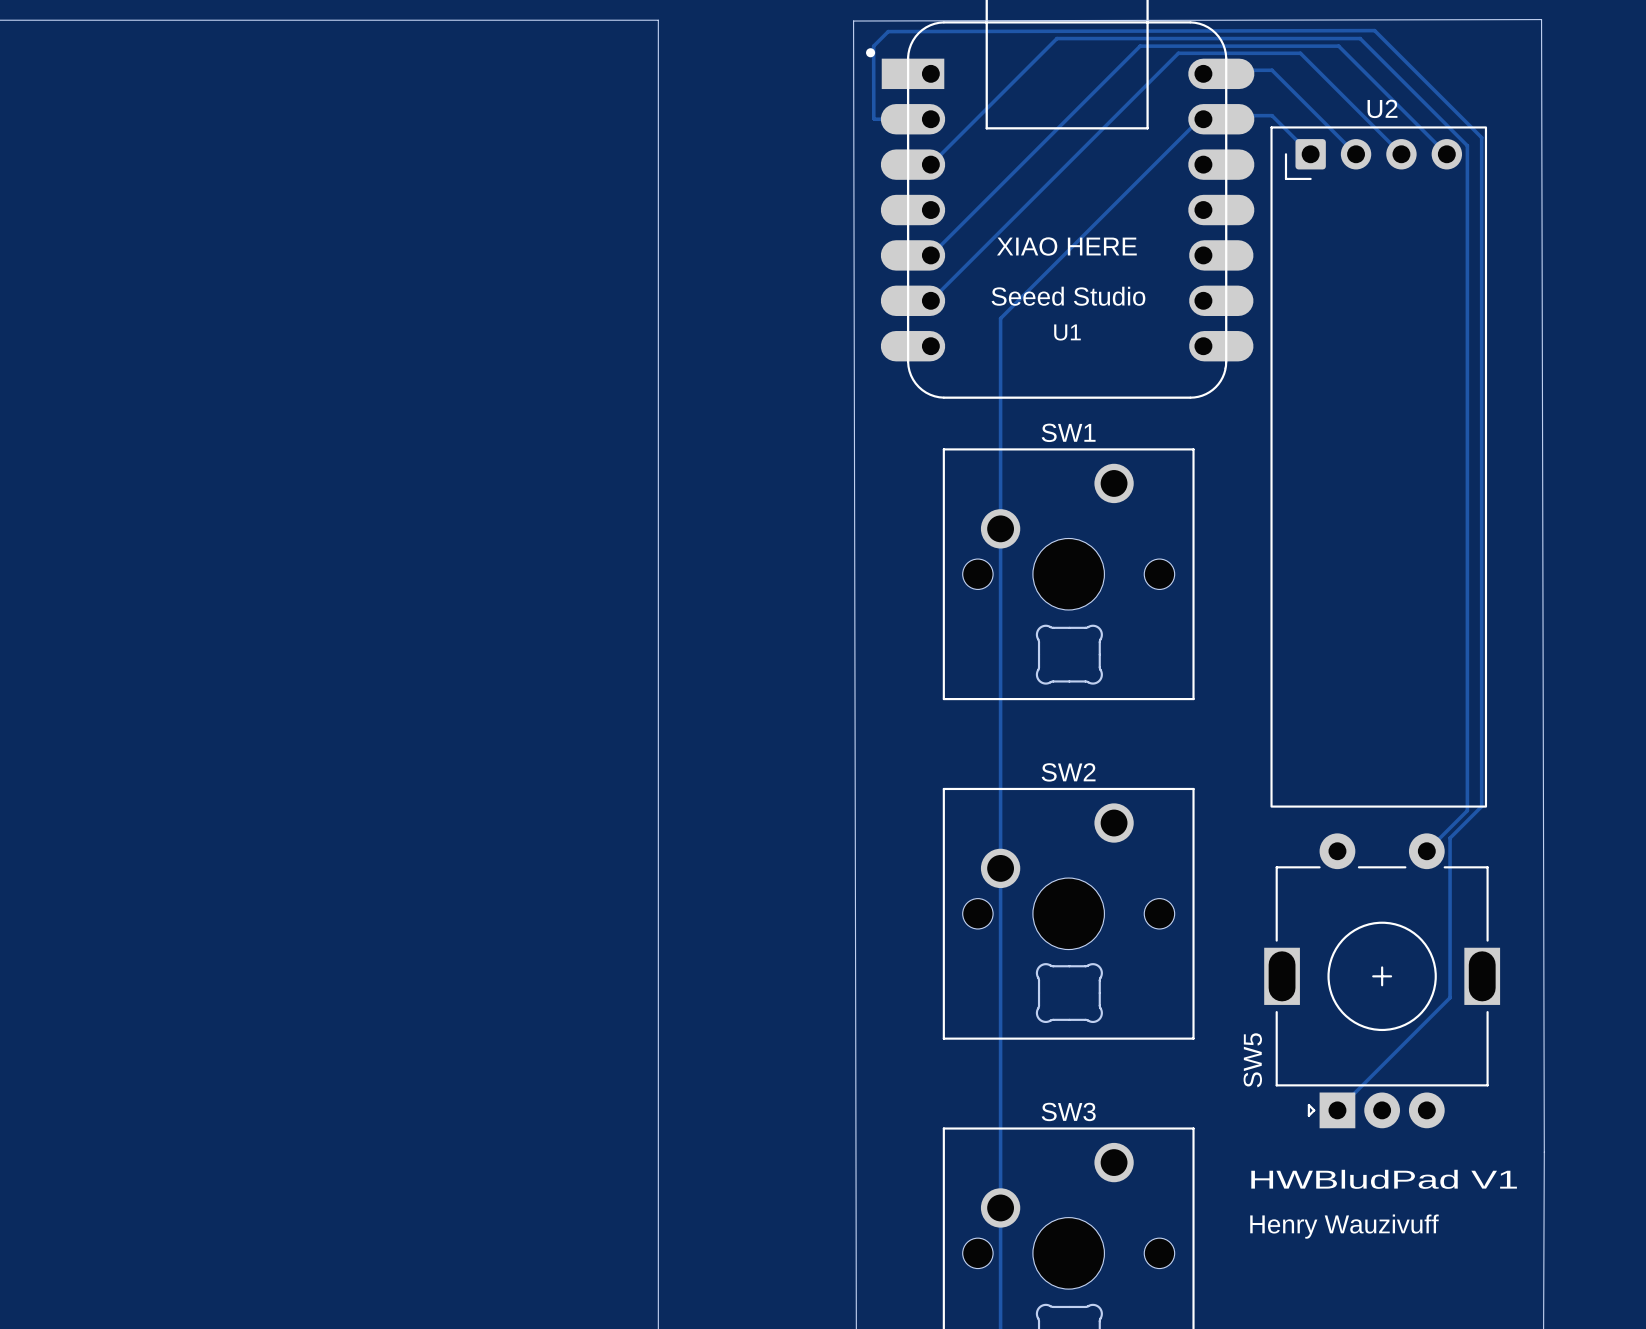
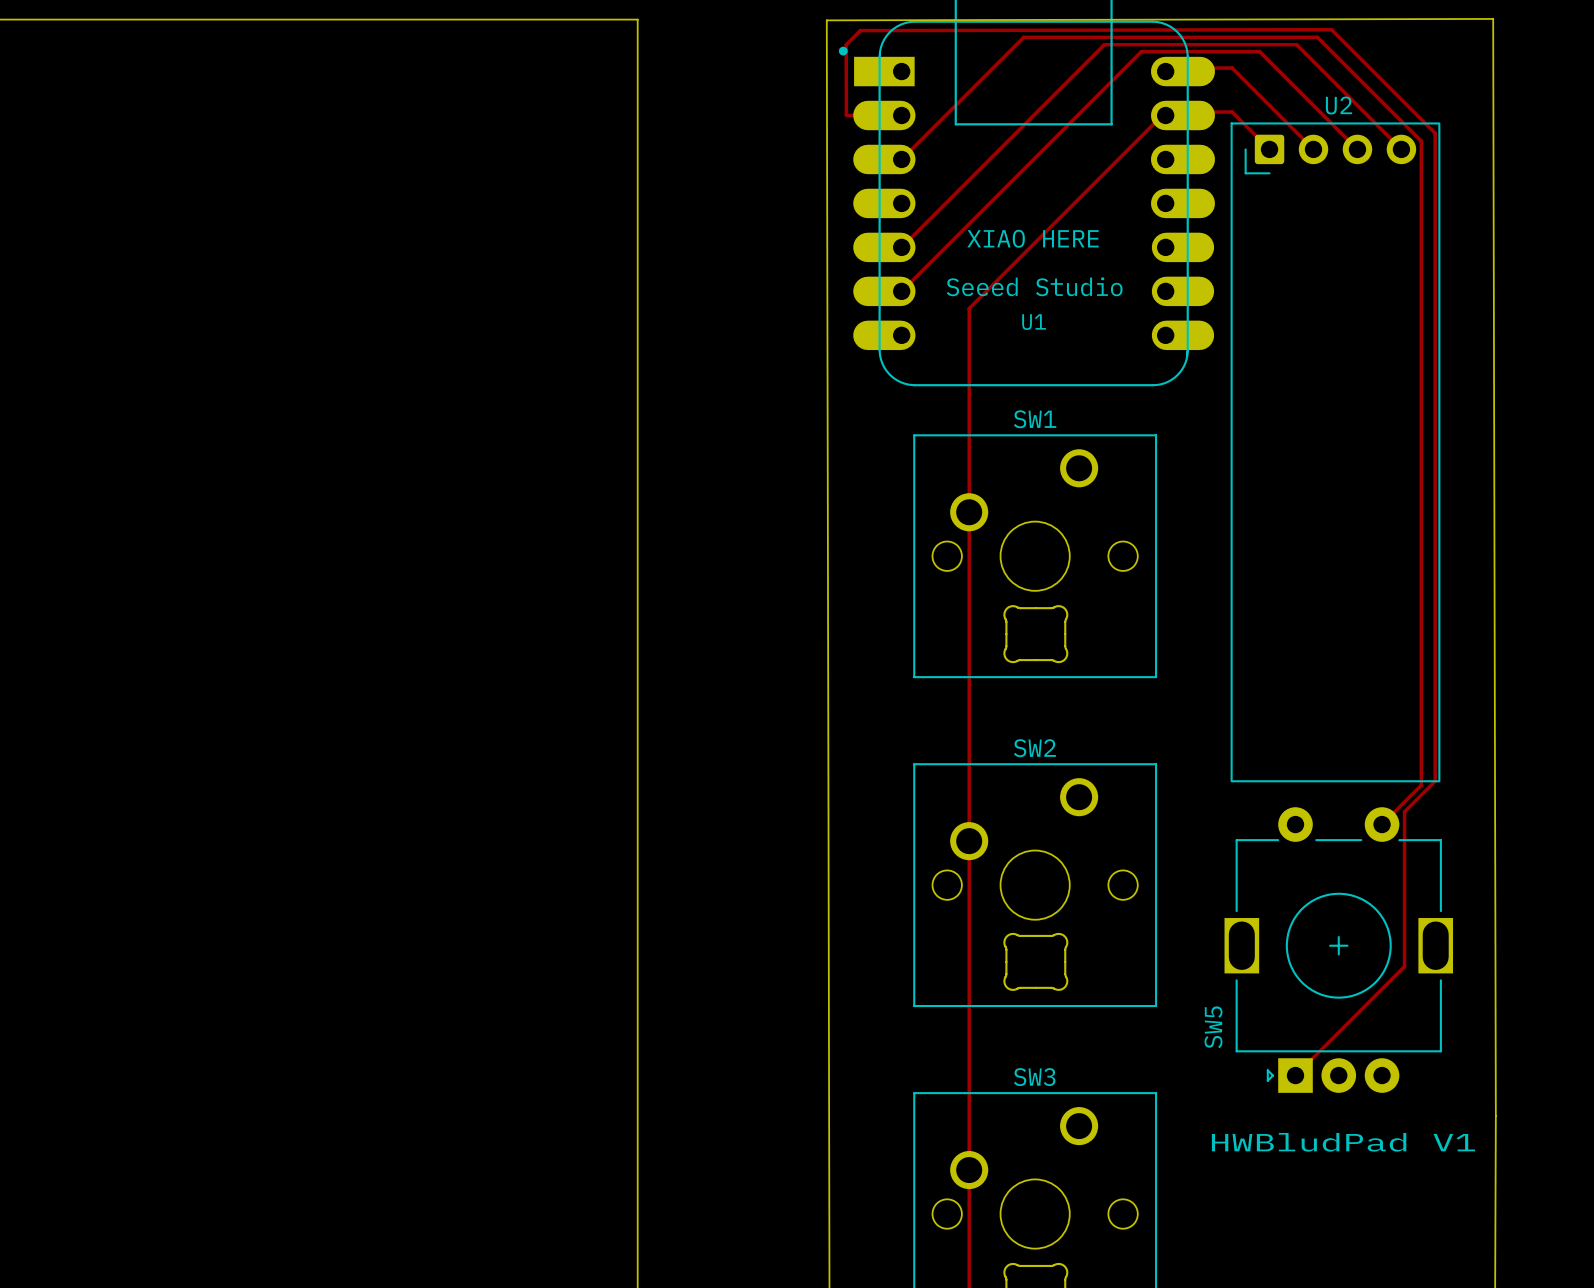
text: Henry Wauzivuff (1344, 1226) -> none

